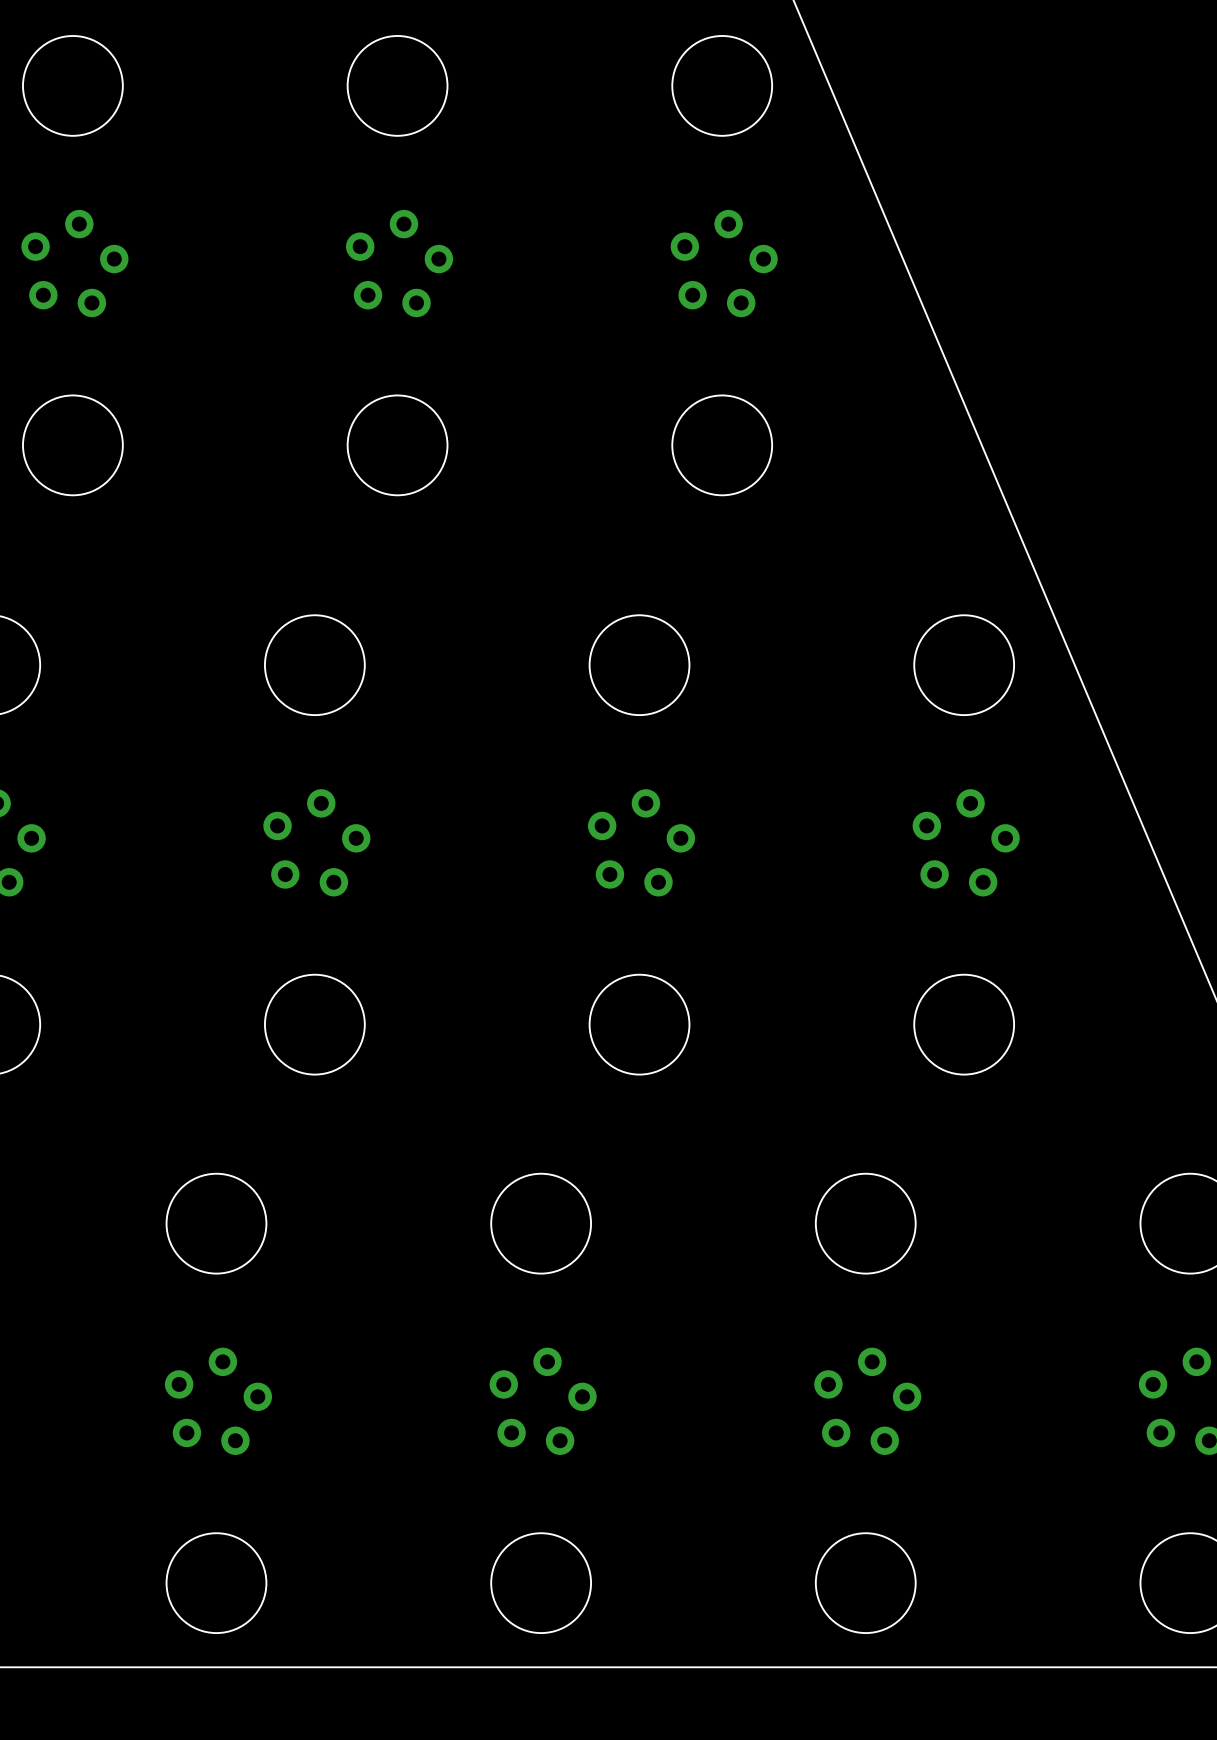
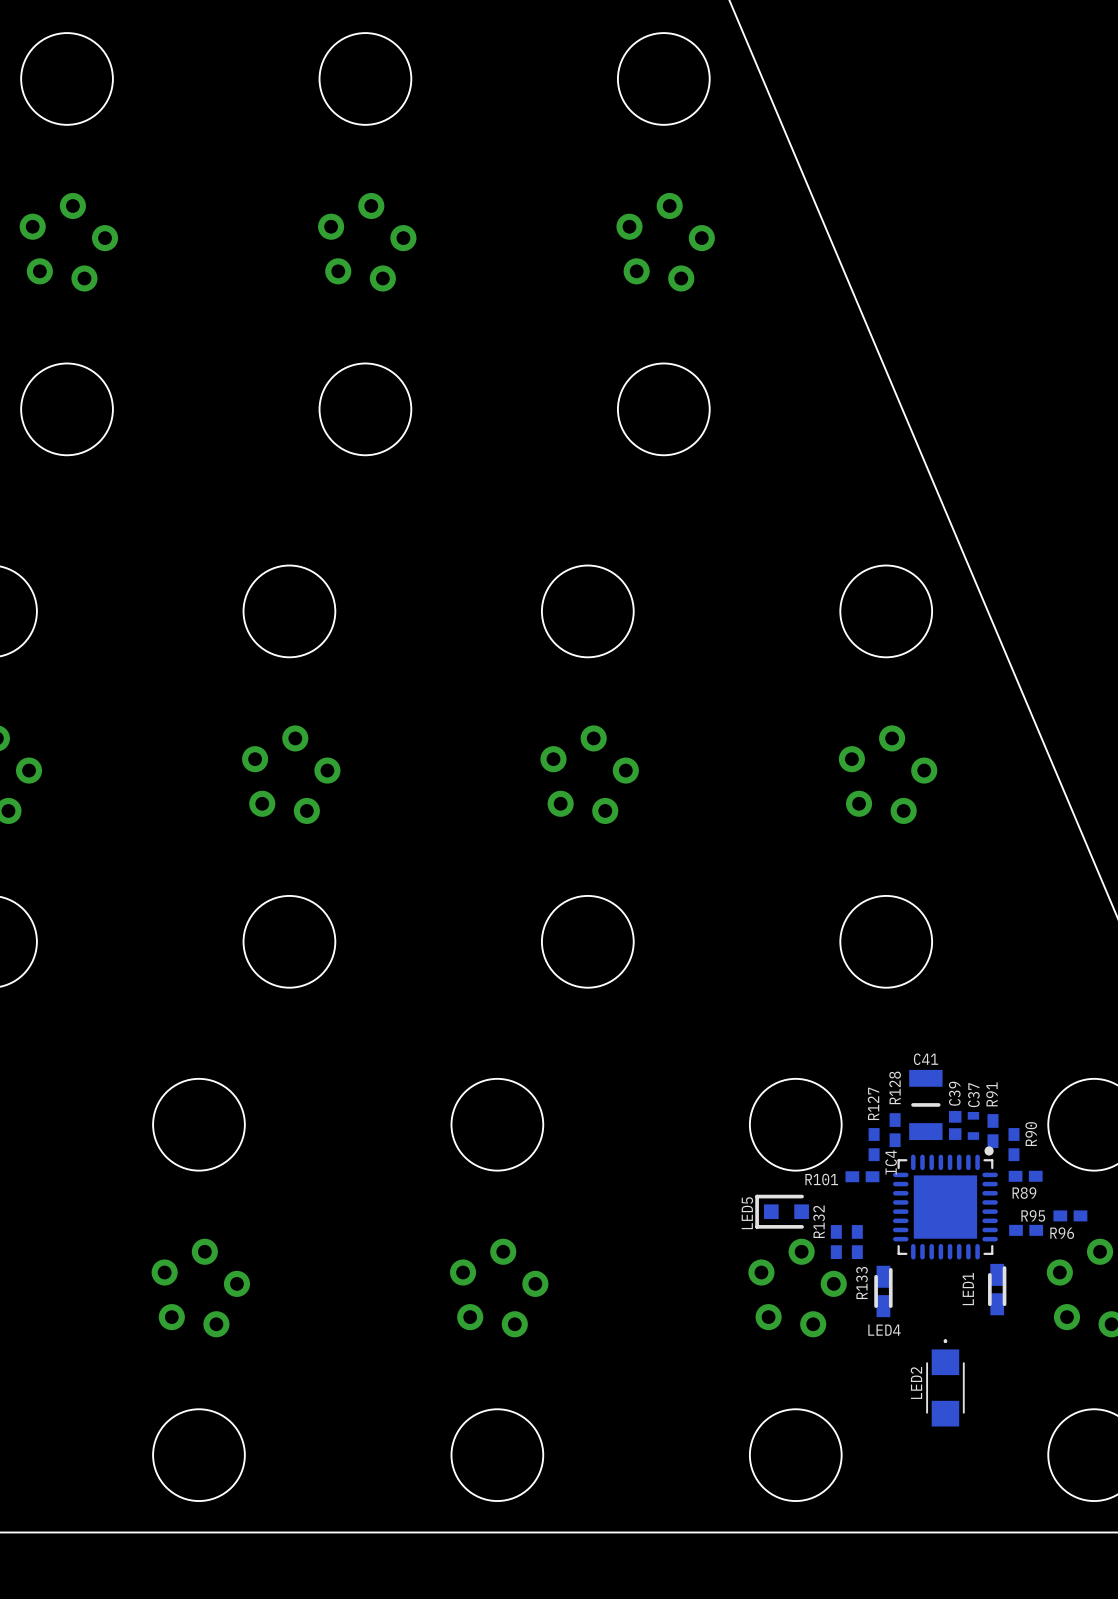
C41: none -> (925, 1104)
C39: none -> (955, 1125)
C37: none -> (973, 1125)
R128: none -> (895, 1130)
R91: none -> (993, 1131)
R127: none -> (874, 1144)
R90: none -> (1013, 1144)
R89: none -> (1025, 1176)
R101: none -> (862, 1176)
IC4: none -> (945, 1202)
LED5: none -> (782, 1211)
R95: none -> (1070, 1215)
R96: none -> (1026, 1230)
R132: none -> (836, 1242)
R133: none -> (857, 1242)
LED1: none -> (997, 1289)
LED4: none -> (883, 1291)
LED2: none -> (945, 1382)

